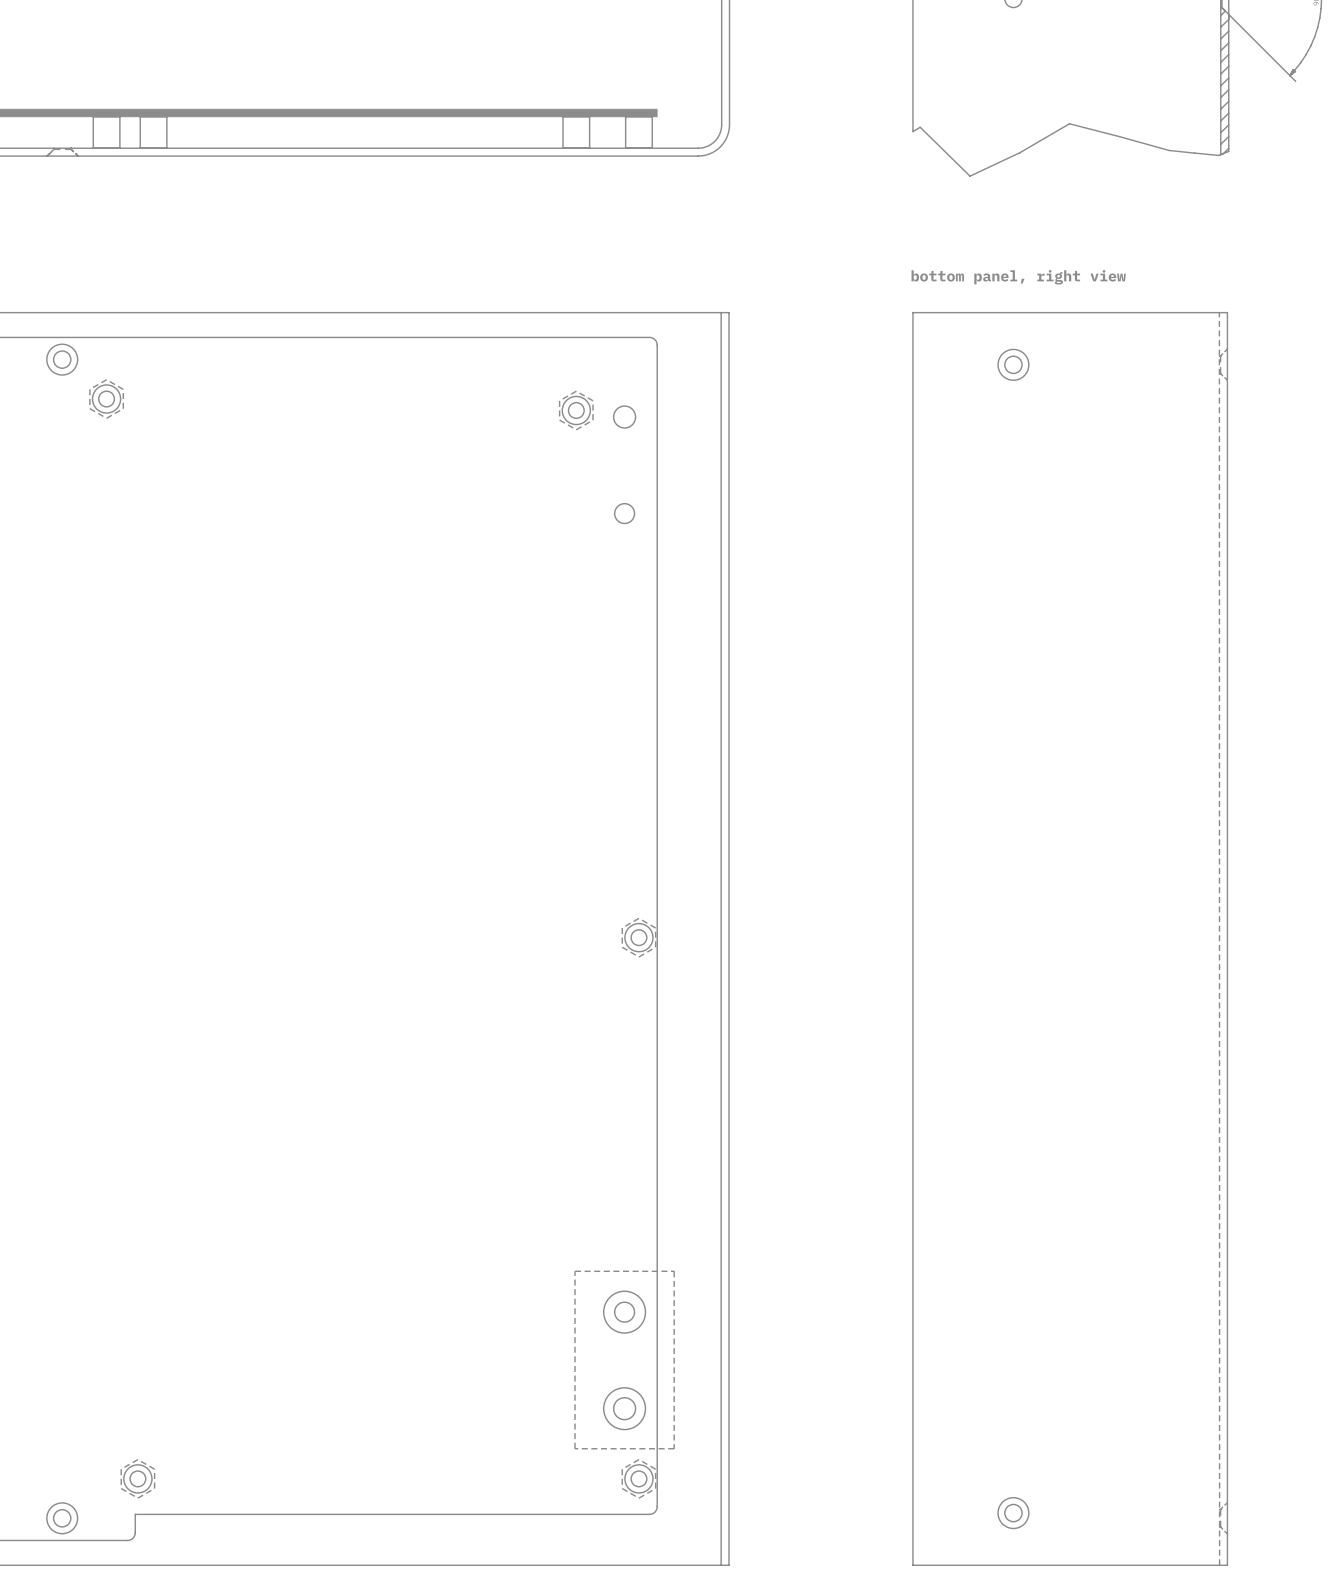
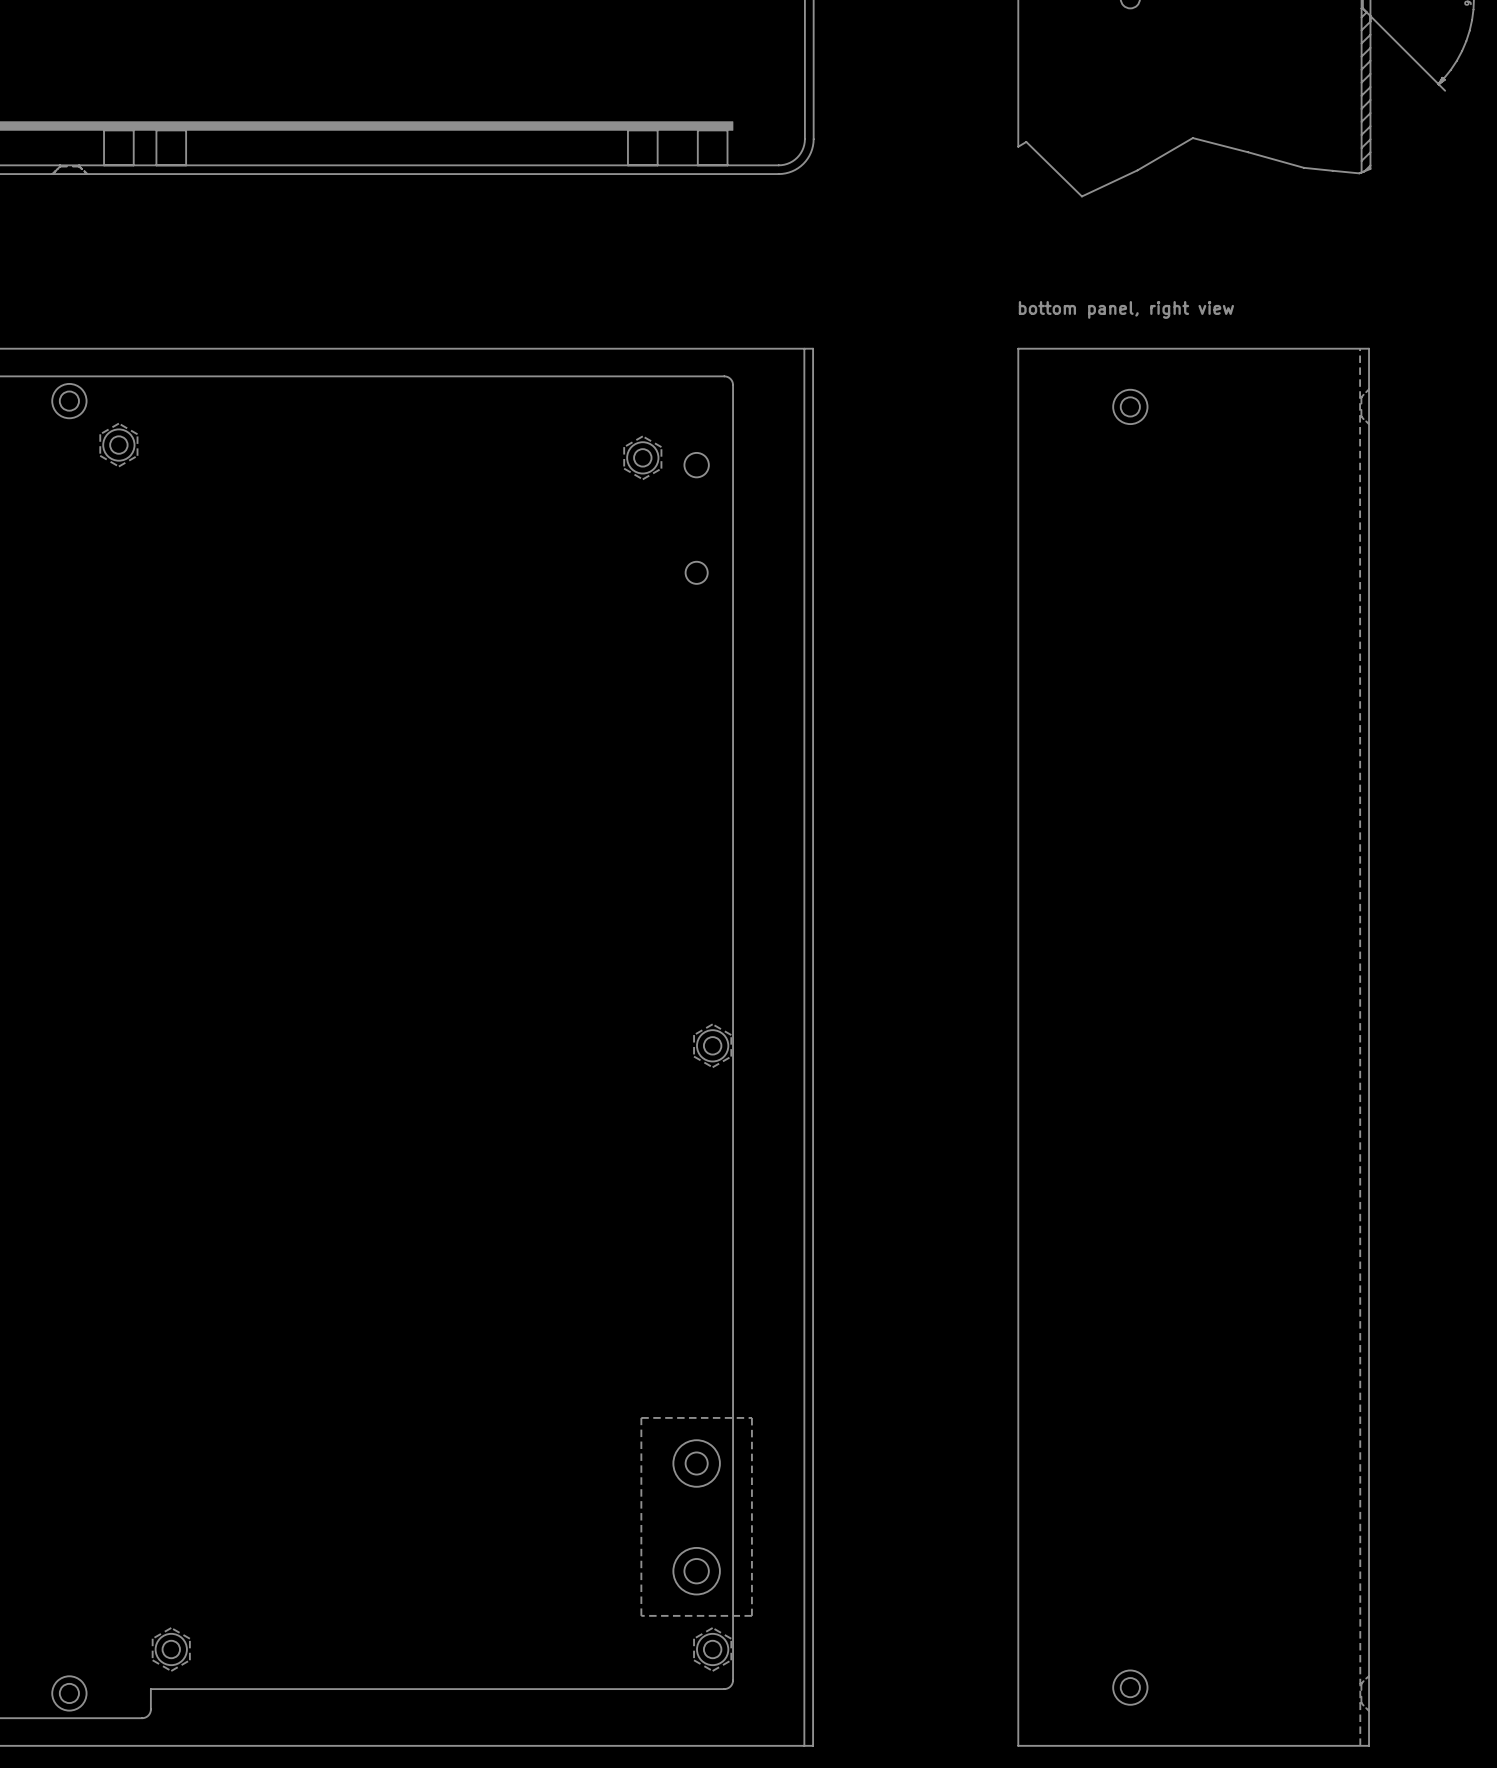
line: (137, 1459) (121, 1469) (121, 1488) (137, 1498) (154, 1488) (154, 1469) (137, 1459) -> (171, 1627) (152, 1638) (152, 1660) (171, 1671) (189, 1660) (189, 1638) (171, 1627)
drawing position: (137, 1478) -> (171, 1649)
drawing position: (137, 1478) -> (171, 1649)

